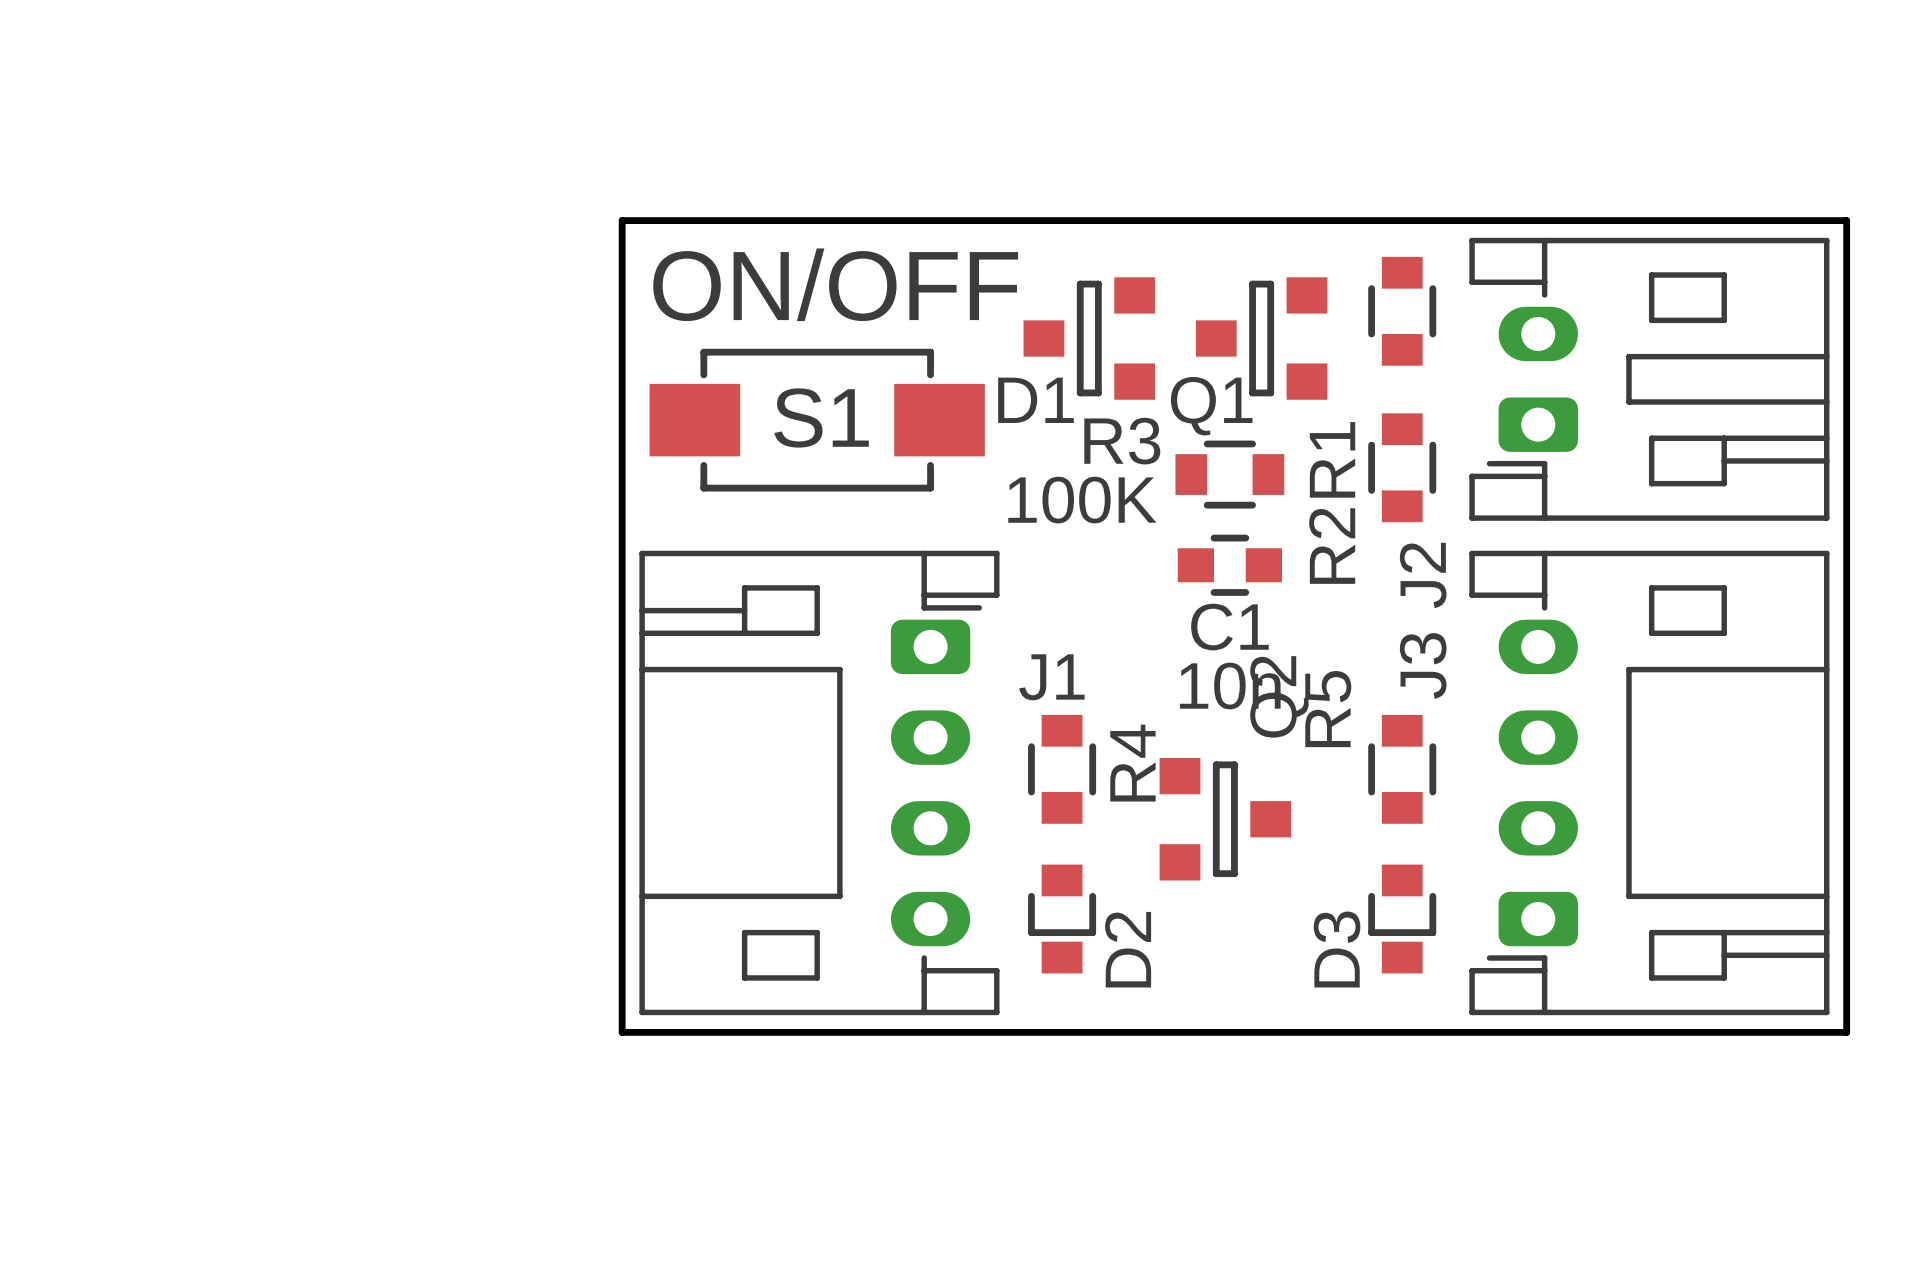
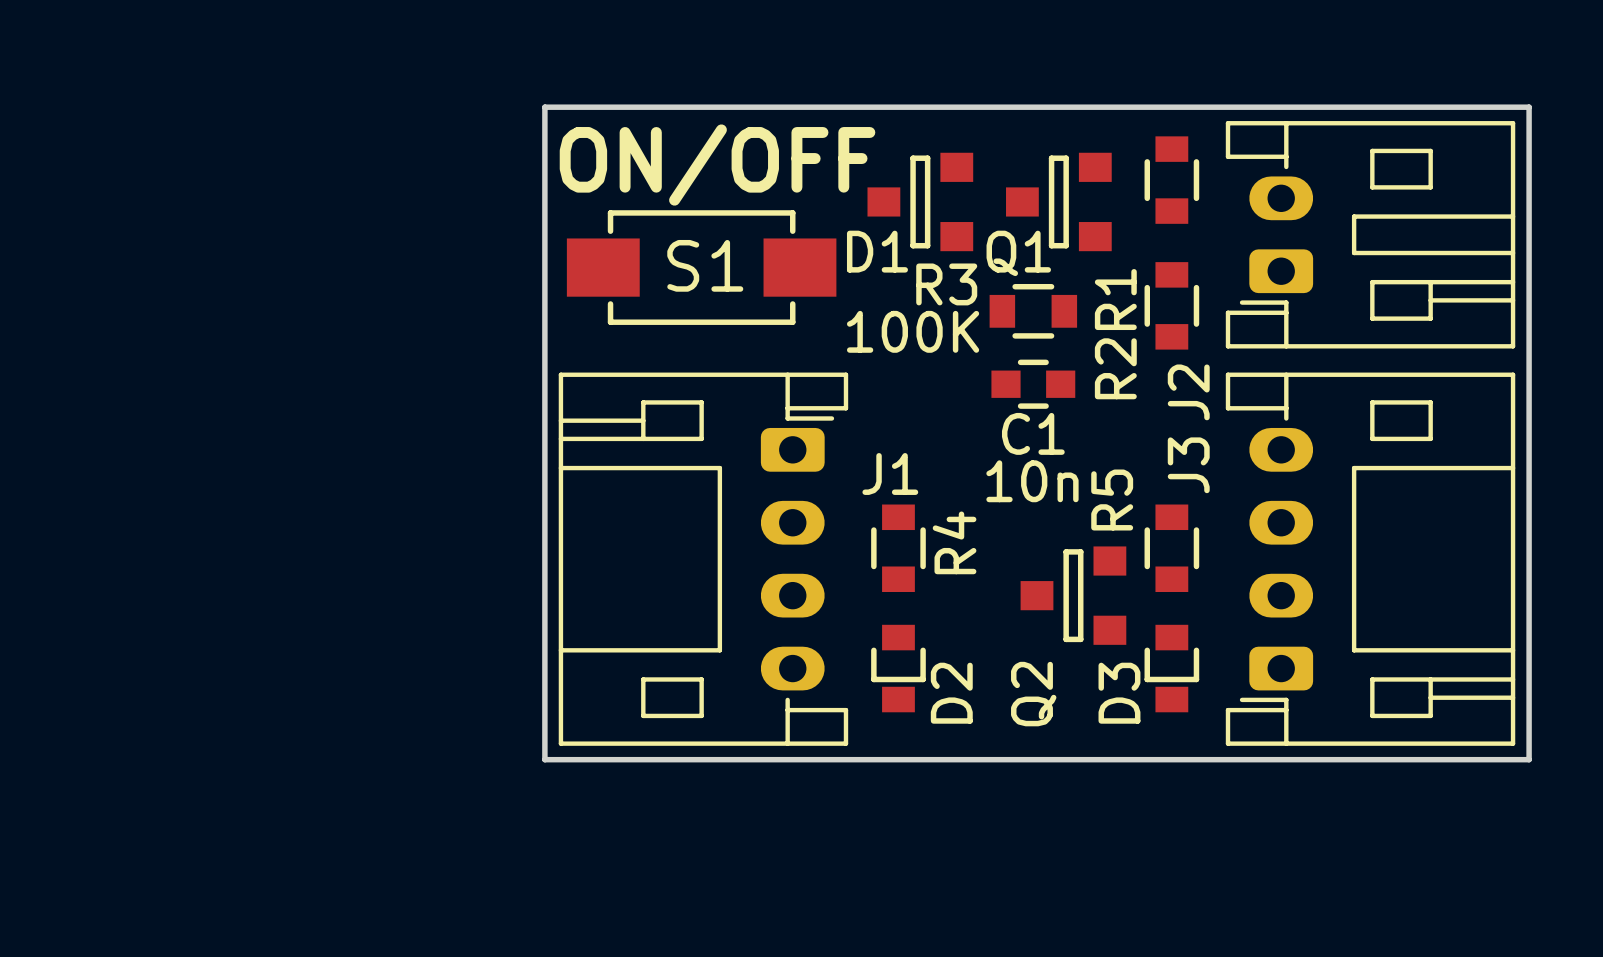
Q2 rotation: 0° (1225, 819) -> 180° (1073, 595)

